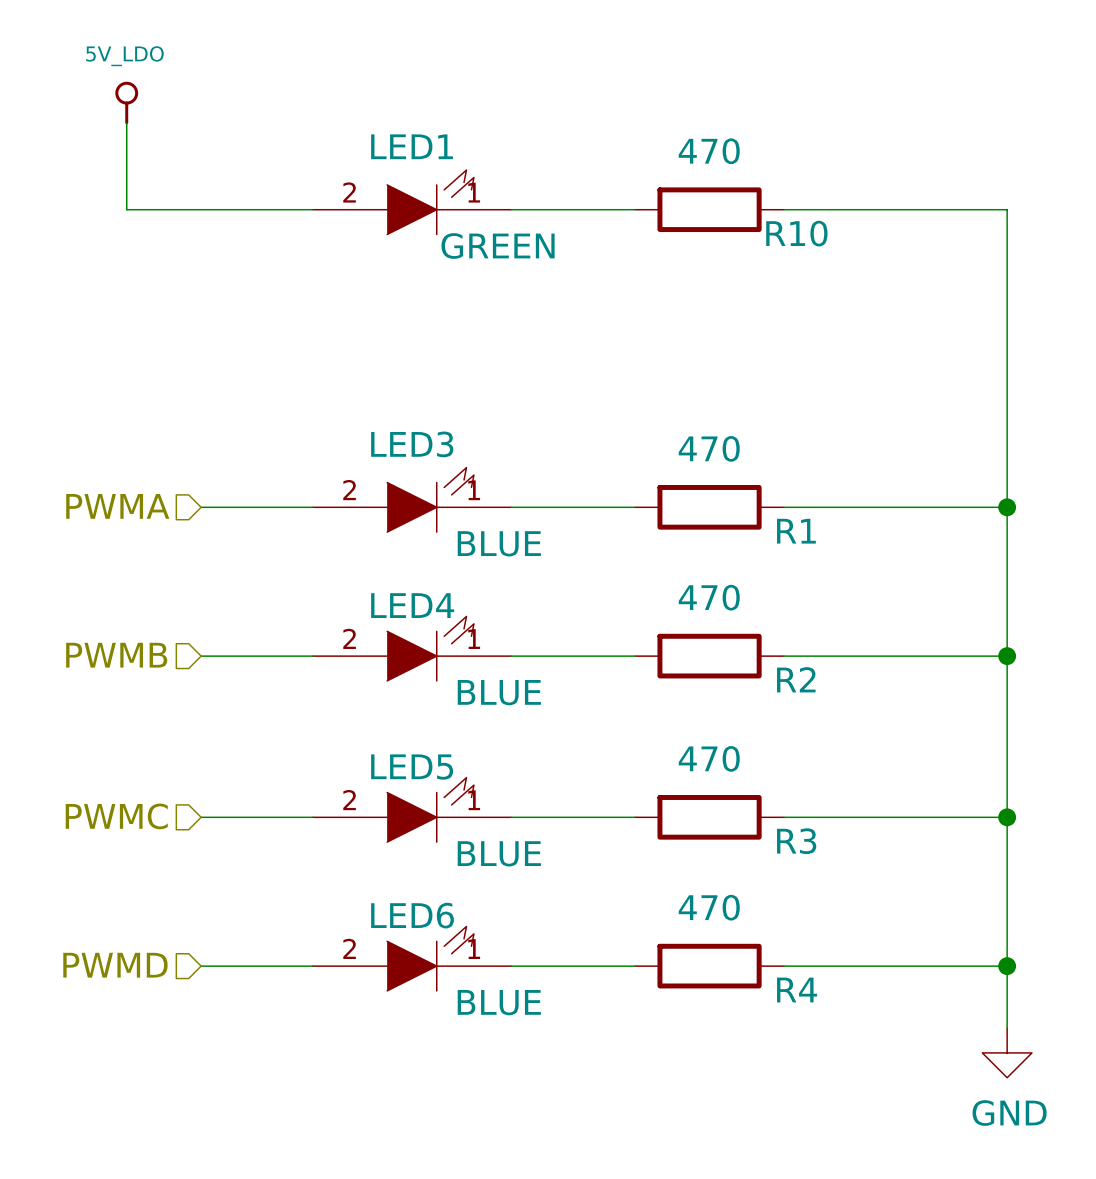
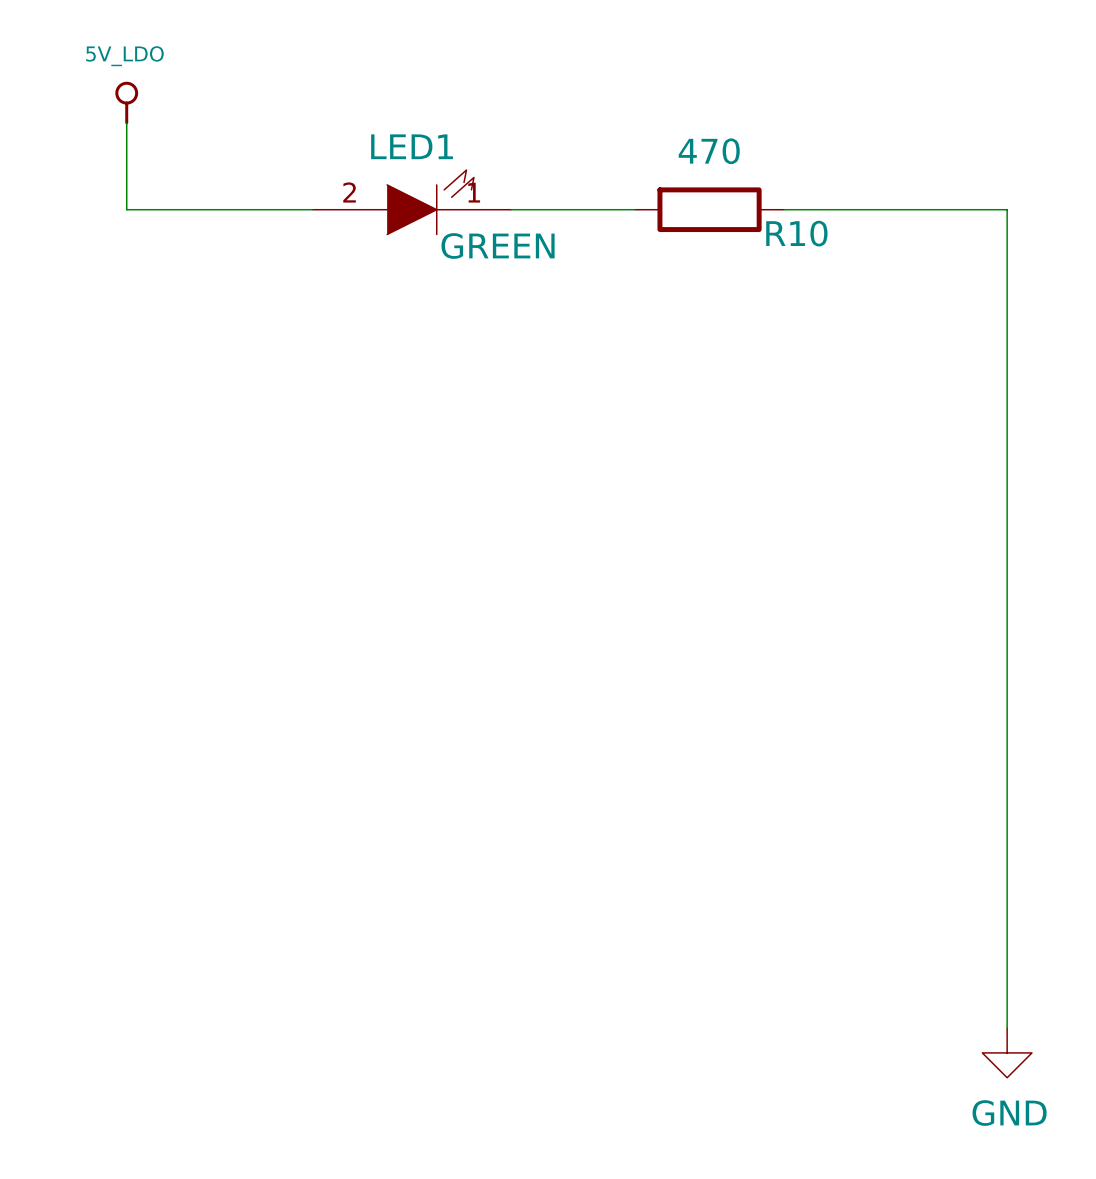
LED3: BLUE (411, 499) -> none
hierarchical label: PWMA (117, 506) -> none
wire: (201, 507) (312, 507) -> none
wire: (511, 507) (635, 507) -> none
R1: 470 (709, 507) -> none
wire: (783, 507) (1007, 507) -> none
junction: (1007, 507) -> none
LED4: BLUE (411, 648) -> none
hierarchical label: PWMB (116, 655) -> none
wire: (201, 656) (312, 656) -> none
wire: (511, 656) (635, 656) -> none
R2: 470 (709, 656) -> none
wire: (783, 656) (1007, 656) -> none
junction: (1007, 656) -> none
LED5: BLUE (411, 809) -> none
hierarchical label: PWMC (116, 816) -> none
wire: (201, 817) (312, 817) -> none
wire: (511, 817) (635, 817) -> none
R3: 470 (709, 817) -> none
wire: (783, 817) (1007, 817) -> none
junction: (1007, 817) -> none
LED6: BLUE (411, 958) -> none
hierarchical label: PWMD (115, 965) -> none
wire: (201, 966) (312, 966) -> none
wire: (511, 966) (635, 966) -> none
R4: 470 (709, 966) -> none
wire: (783, 966) (1007, 966) -> none
junction: (1007, 966) -> none

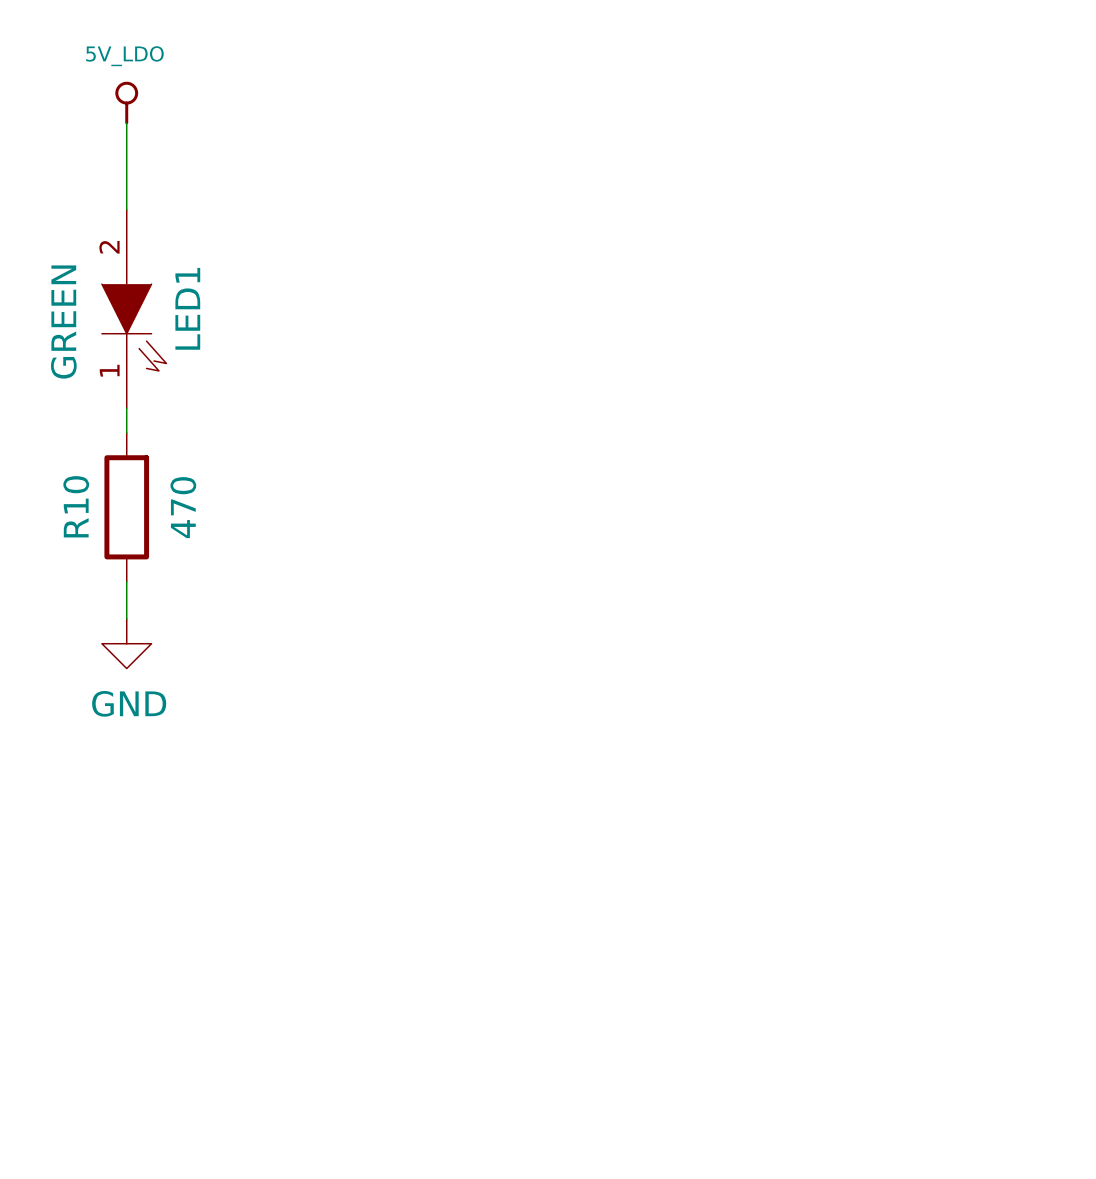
LED1 position: (411, 202) -> (134, 308)
LED1 rotation: 0° (430, 202) -> 90° clockwise (134, 327)
wire: (126, 209) (312, 209) -> none
wire: (511, 209) (635, 209) -> none
R10 rotation: 0° (709, 209) -> 90° clockwise (126, 507)
R10 position: (709, 209) -> (126, 507)
wire: (783, 209) (1007, 209) (1007, 1028) -> none
R10 name position: R10 (796, 233) -> R10 (76, 506)
LED1 value position: GREEN (498, 246) -> GREEN (63, 322)
wire: none -> (126, 408) (126, 432)
wire: none -> (126, 581) (126, 618)
power symbol: none -> GND (126, 643)
power symbol: GND (1007, 1052) -> none

